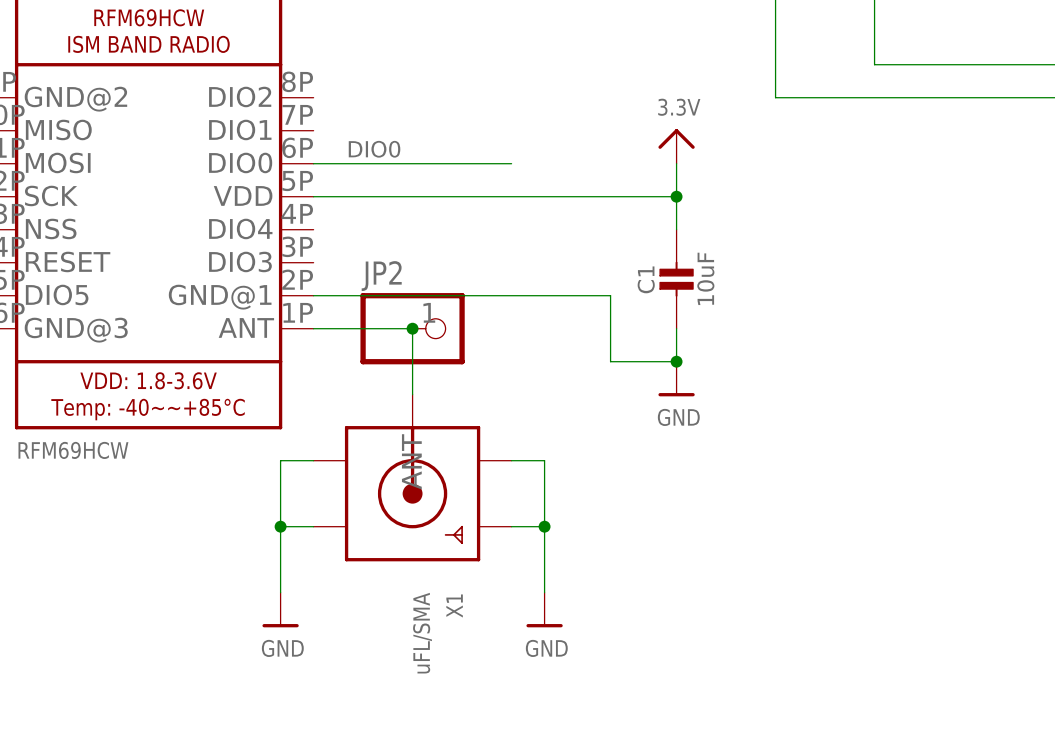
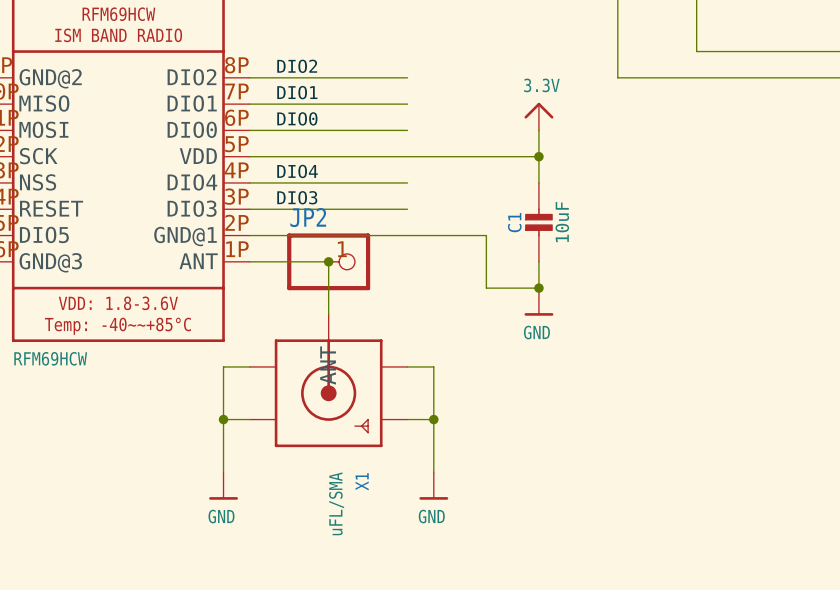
label: none -> DIO2 (297, 66)
wire: none -> (249, 77) (407, 77)
label: none -> DIO1 (297, 92)
wire: none -> (249, 104) (407, 104)
label: none -> DIO4 (297, 171)
wire: none -> (249, 182) (407, 182)
label: none -> DIO3 (297, 197)
wire: none -> (249, 209) (407, 209)

